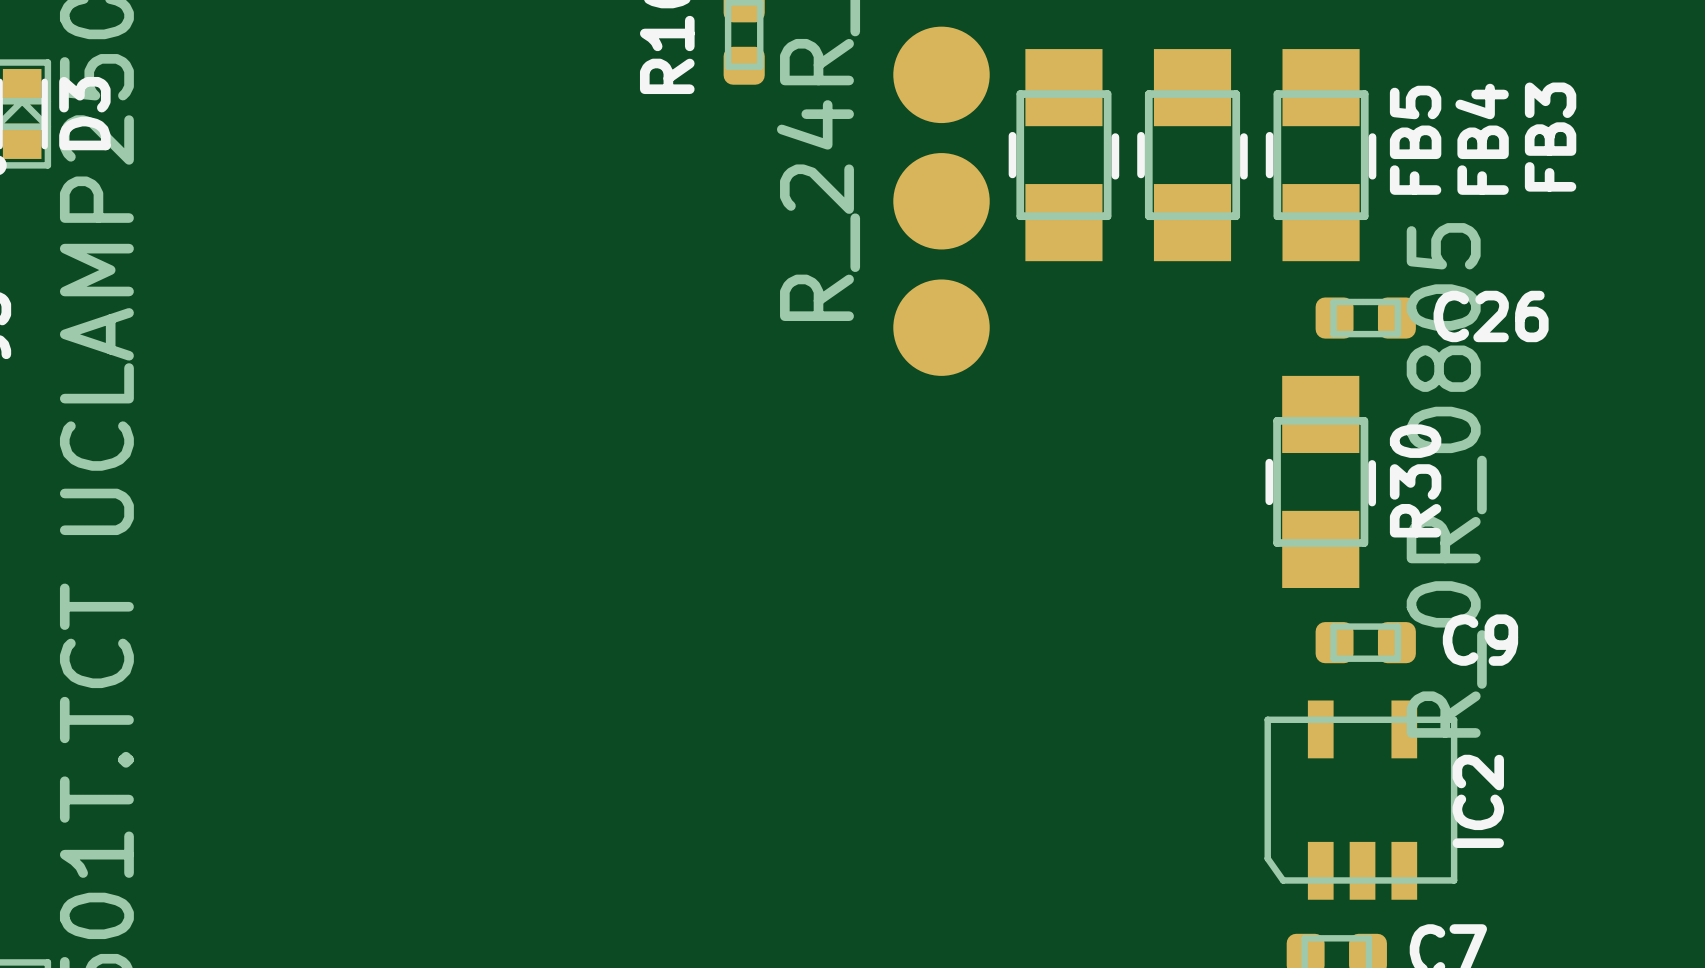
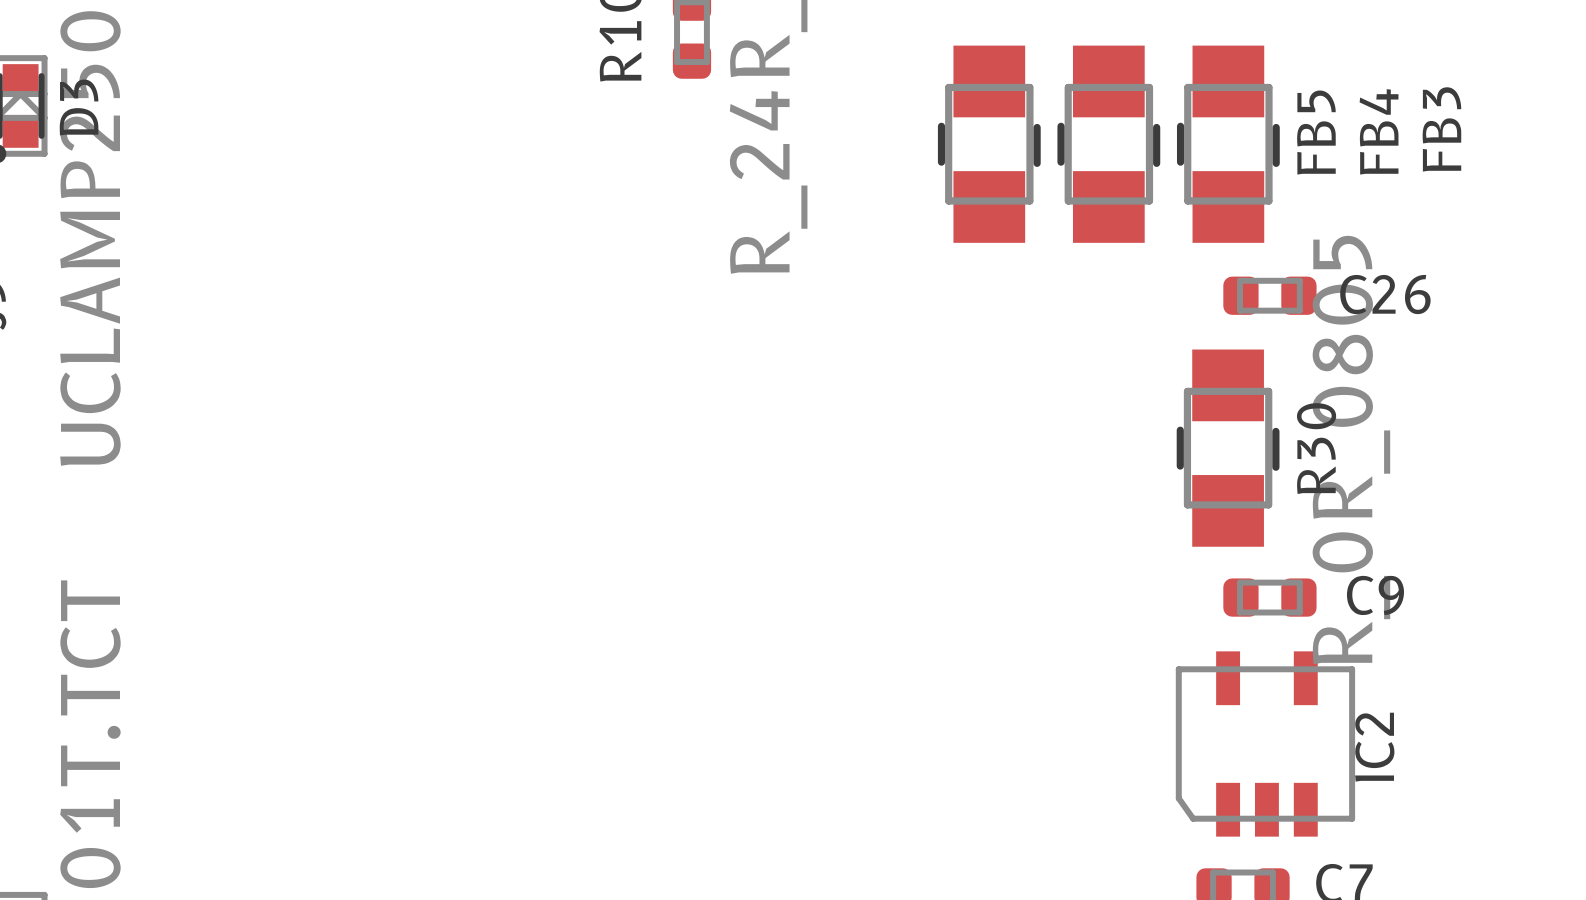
part: (941, 74) -> none
part: (941, 201) -> none
part: (941, 327) -> none

